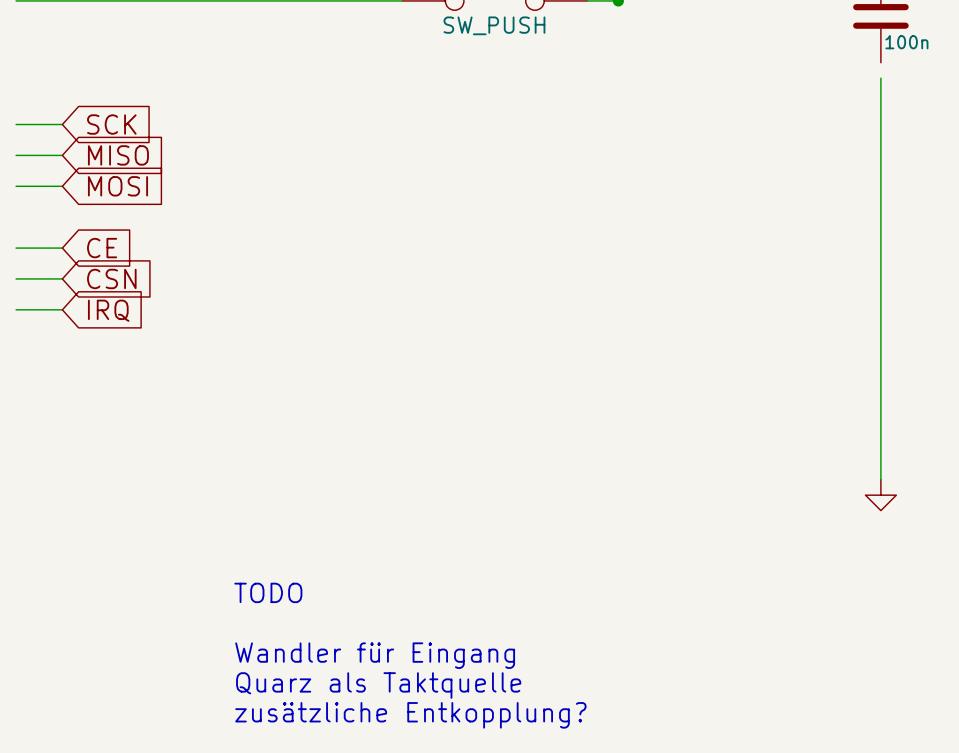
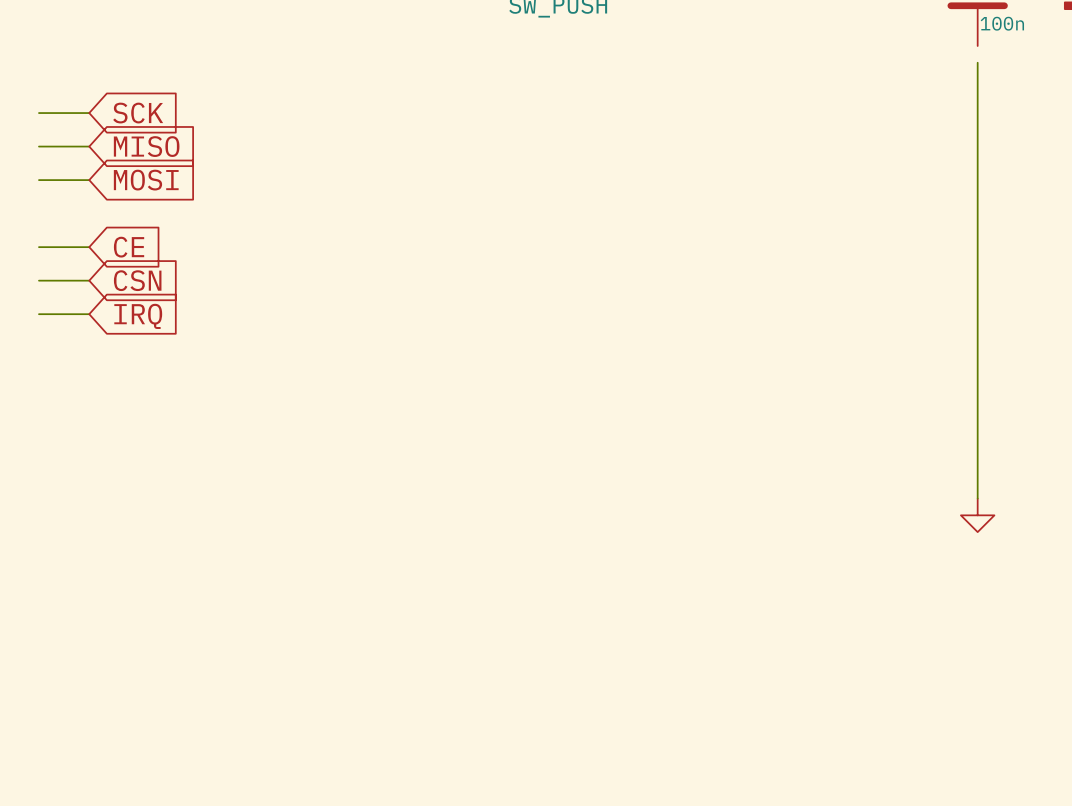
text: TODO (268, 592) -> none
text: Wandler für Eingang (375, 655) -> none
text: Quarz als Taktquelle (378, 685) -> none
text: zusätzliche Entkopplung? (410, 715) -> none

